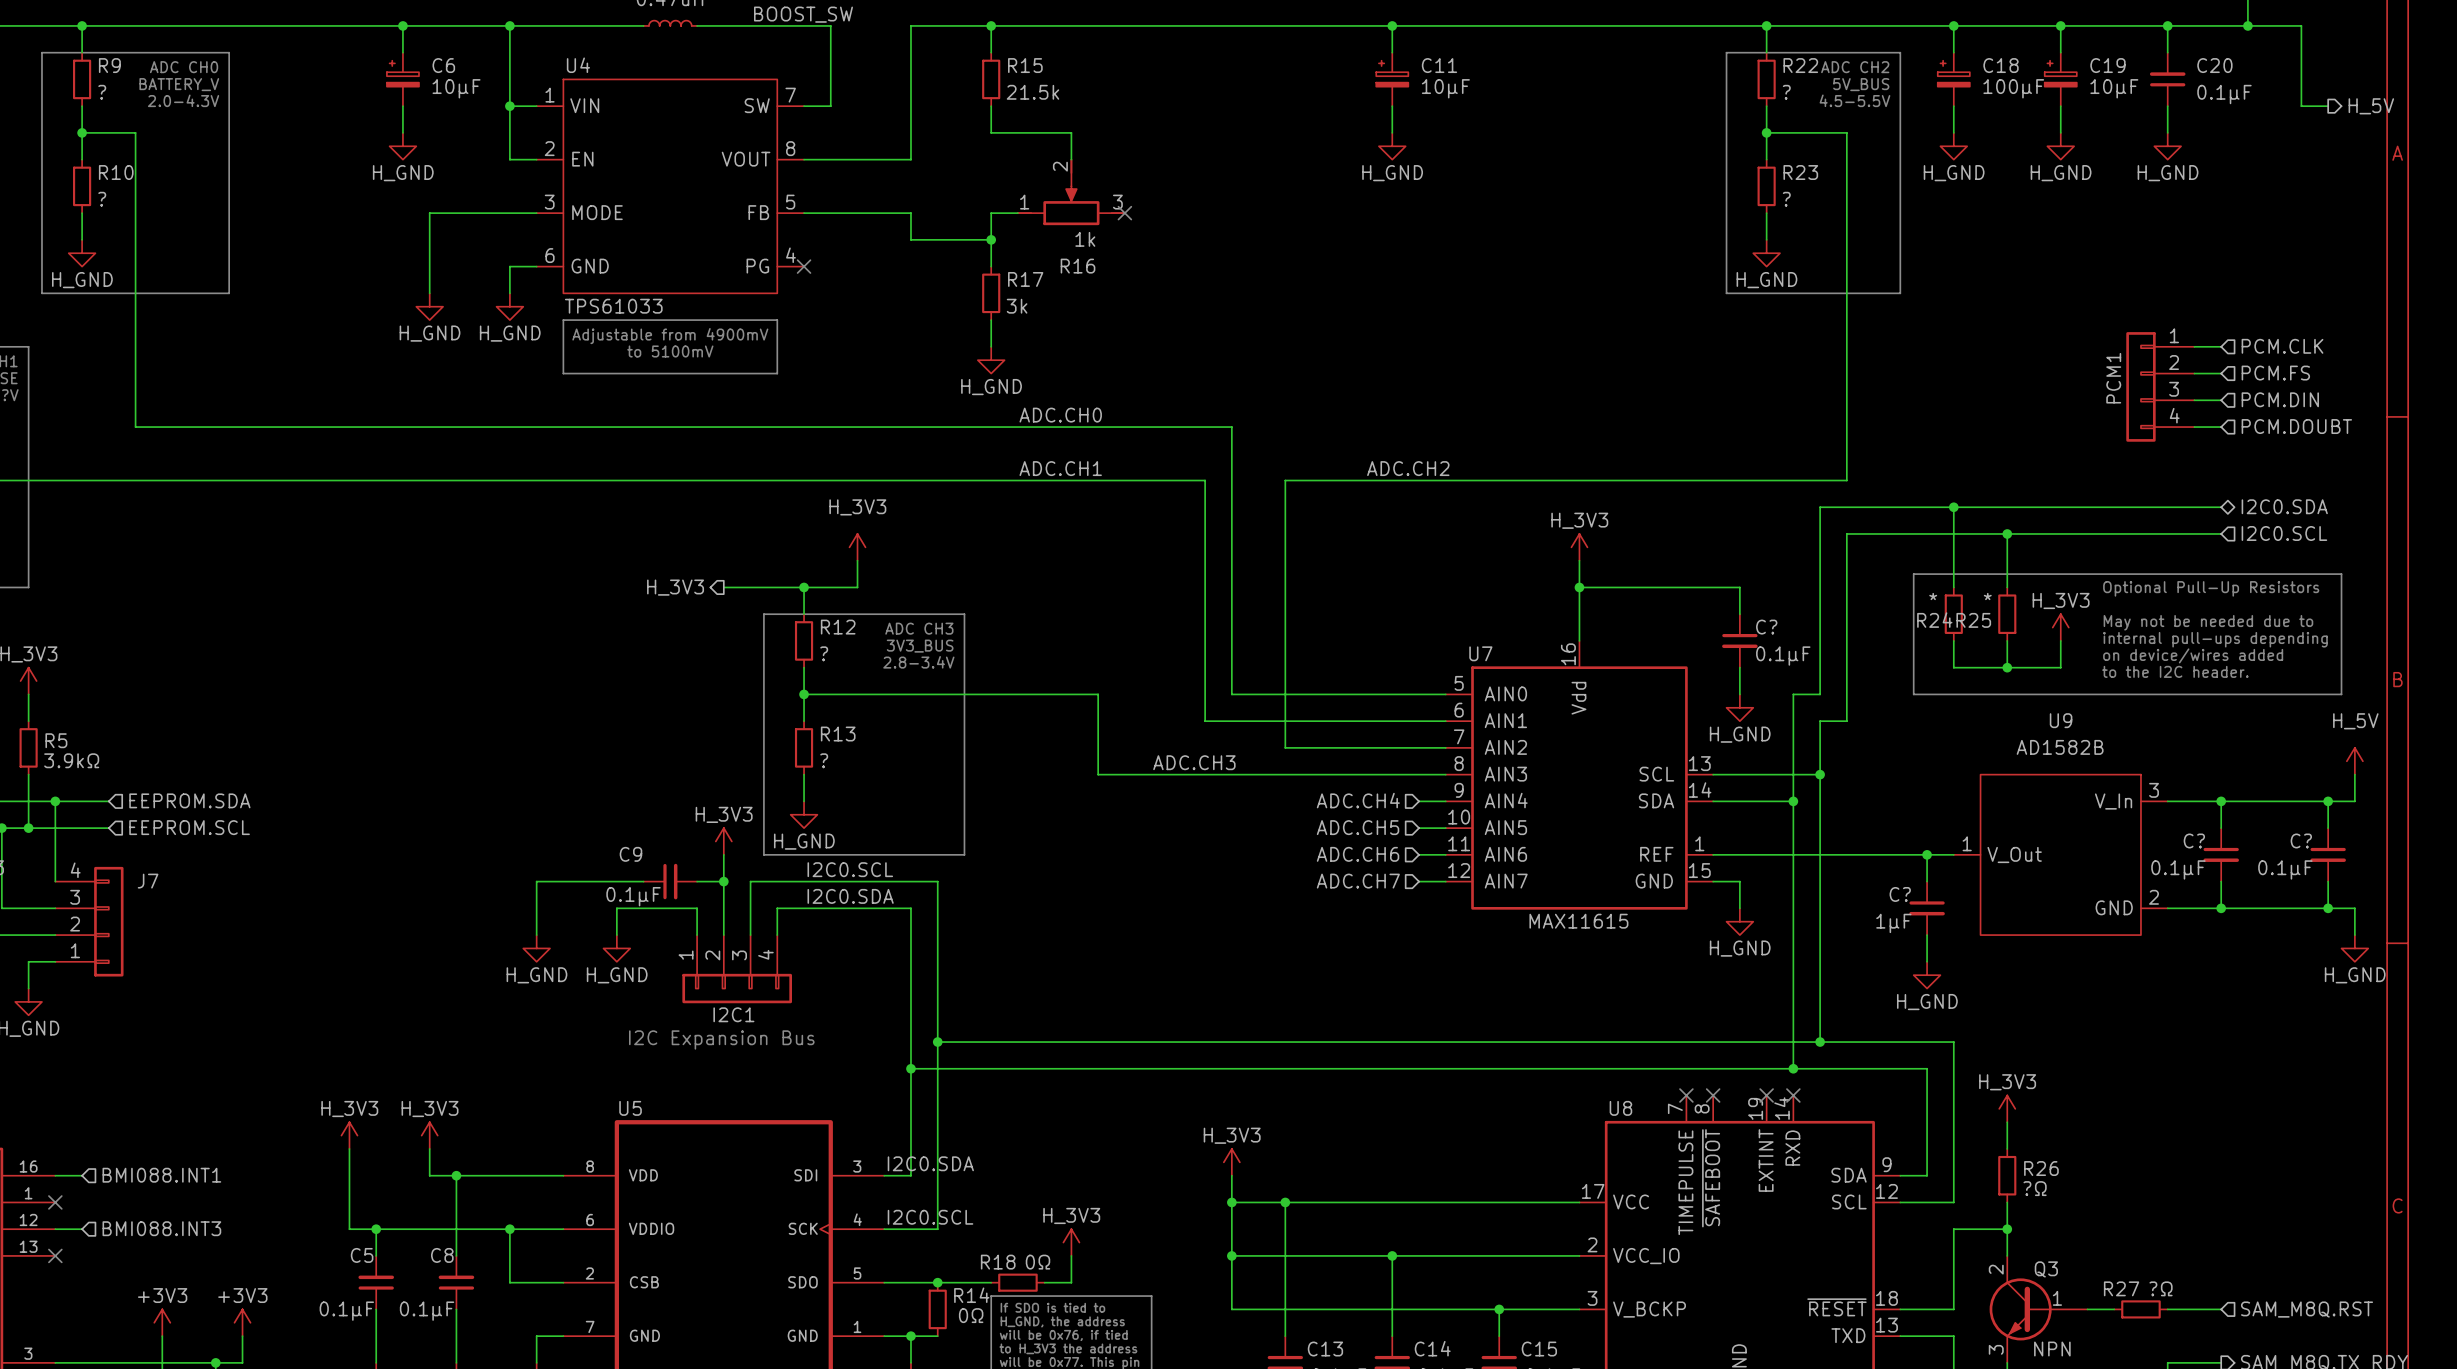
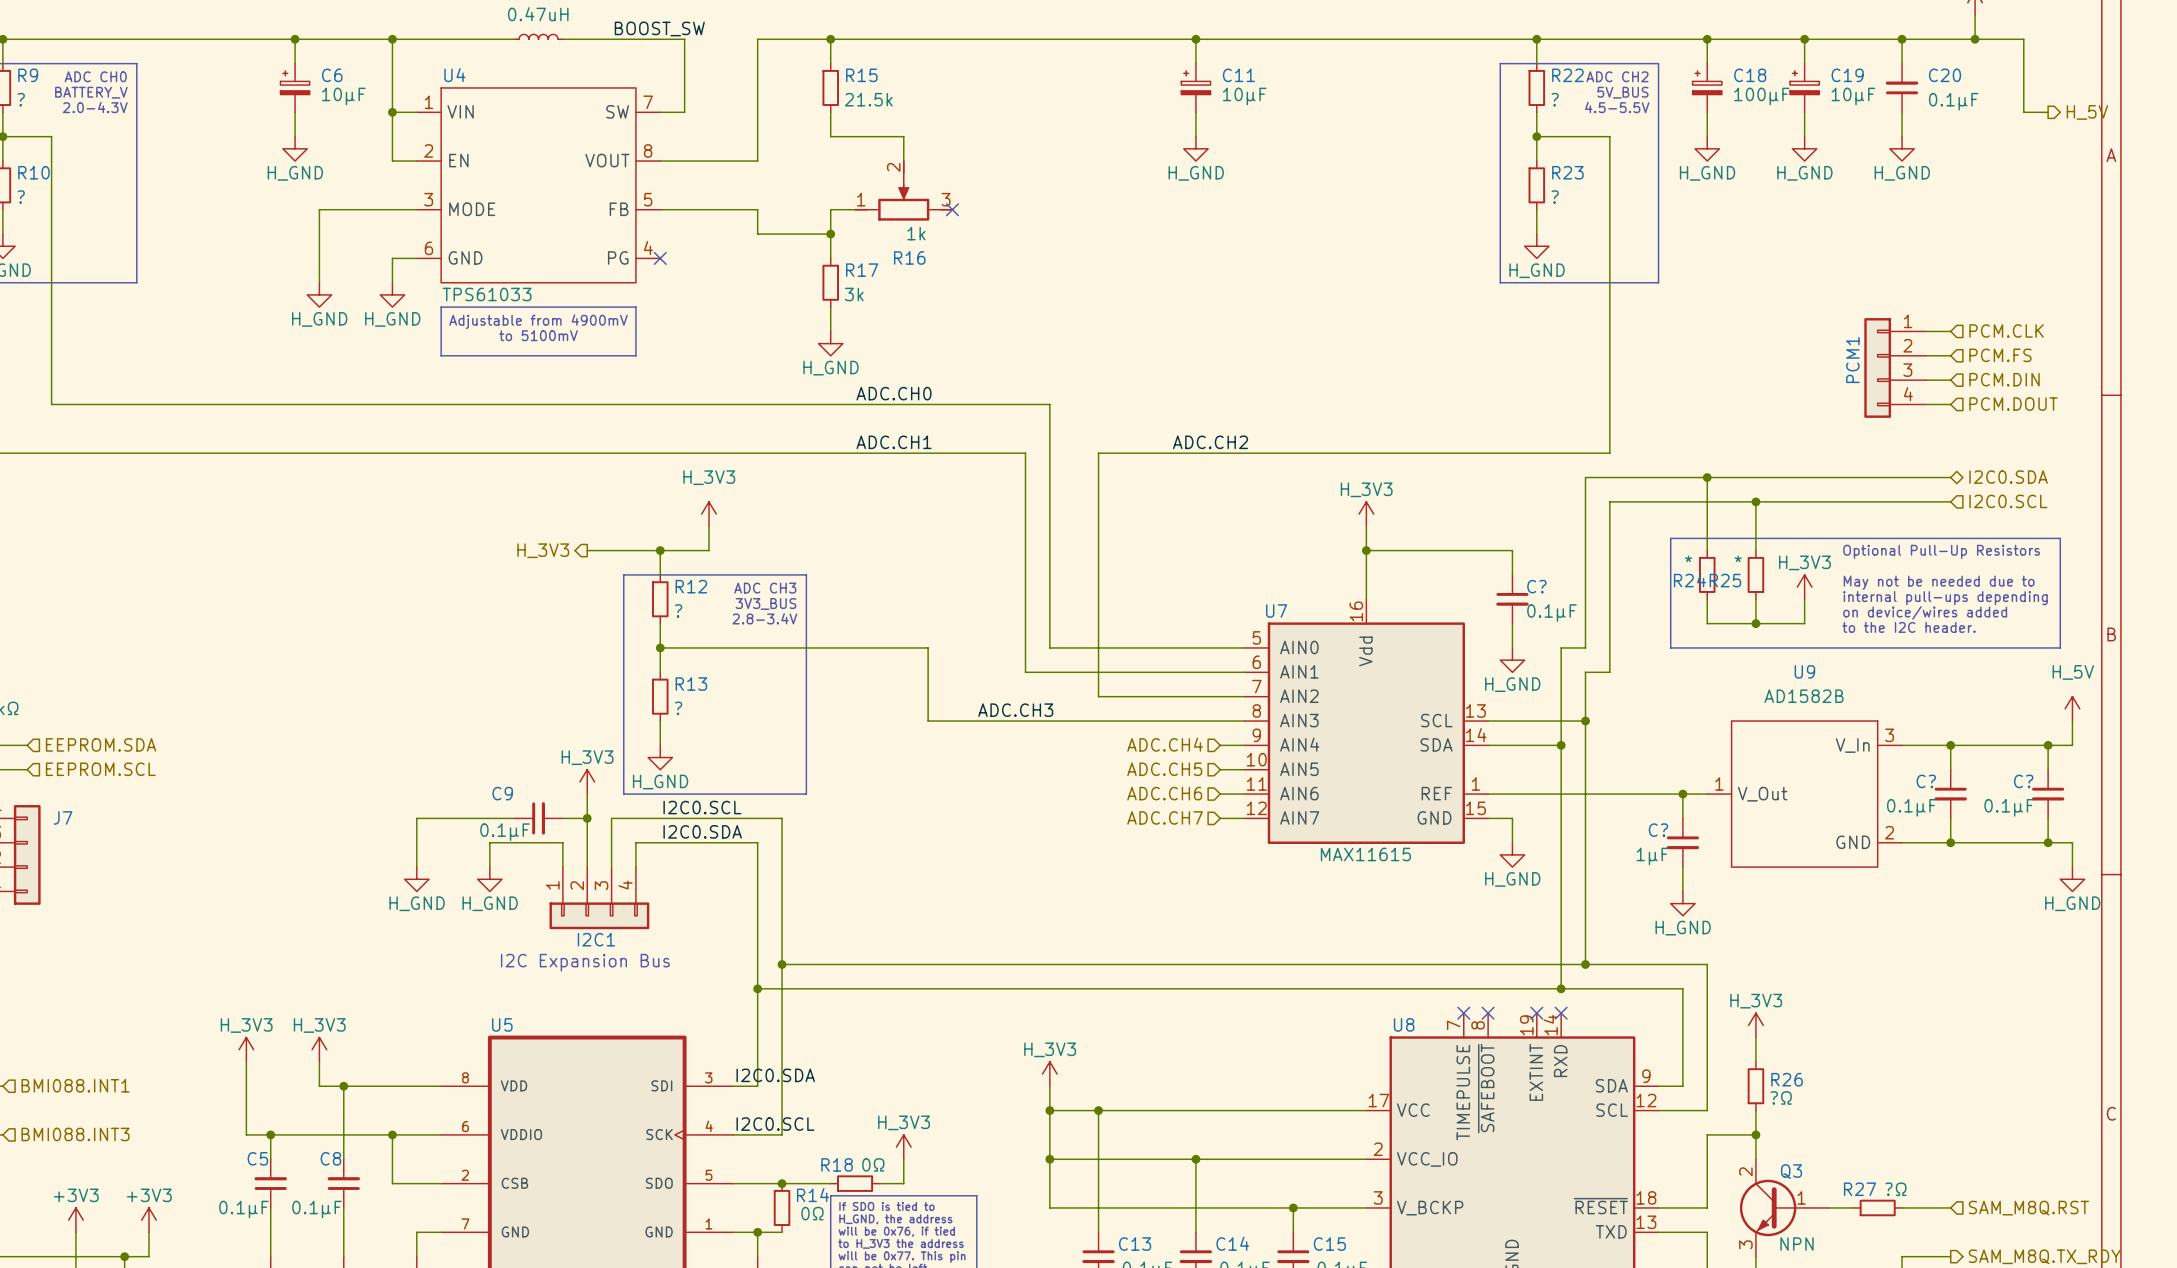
hierarchical label: PCM.DOUBT (2296, 426) -> PCM.DOUT (2013, 404)

